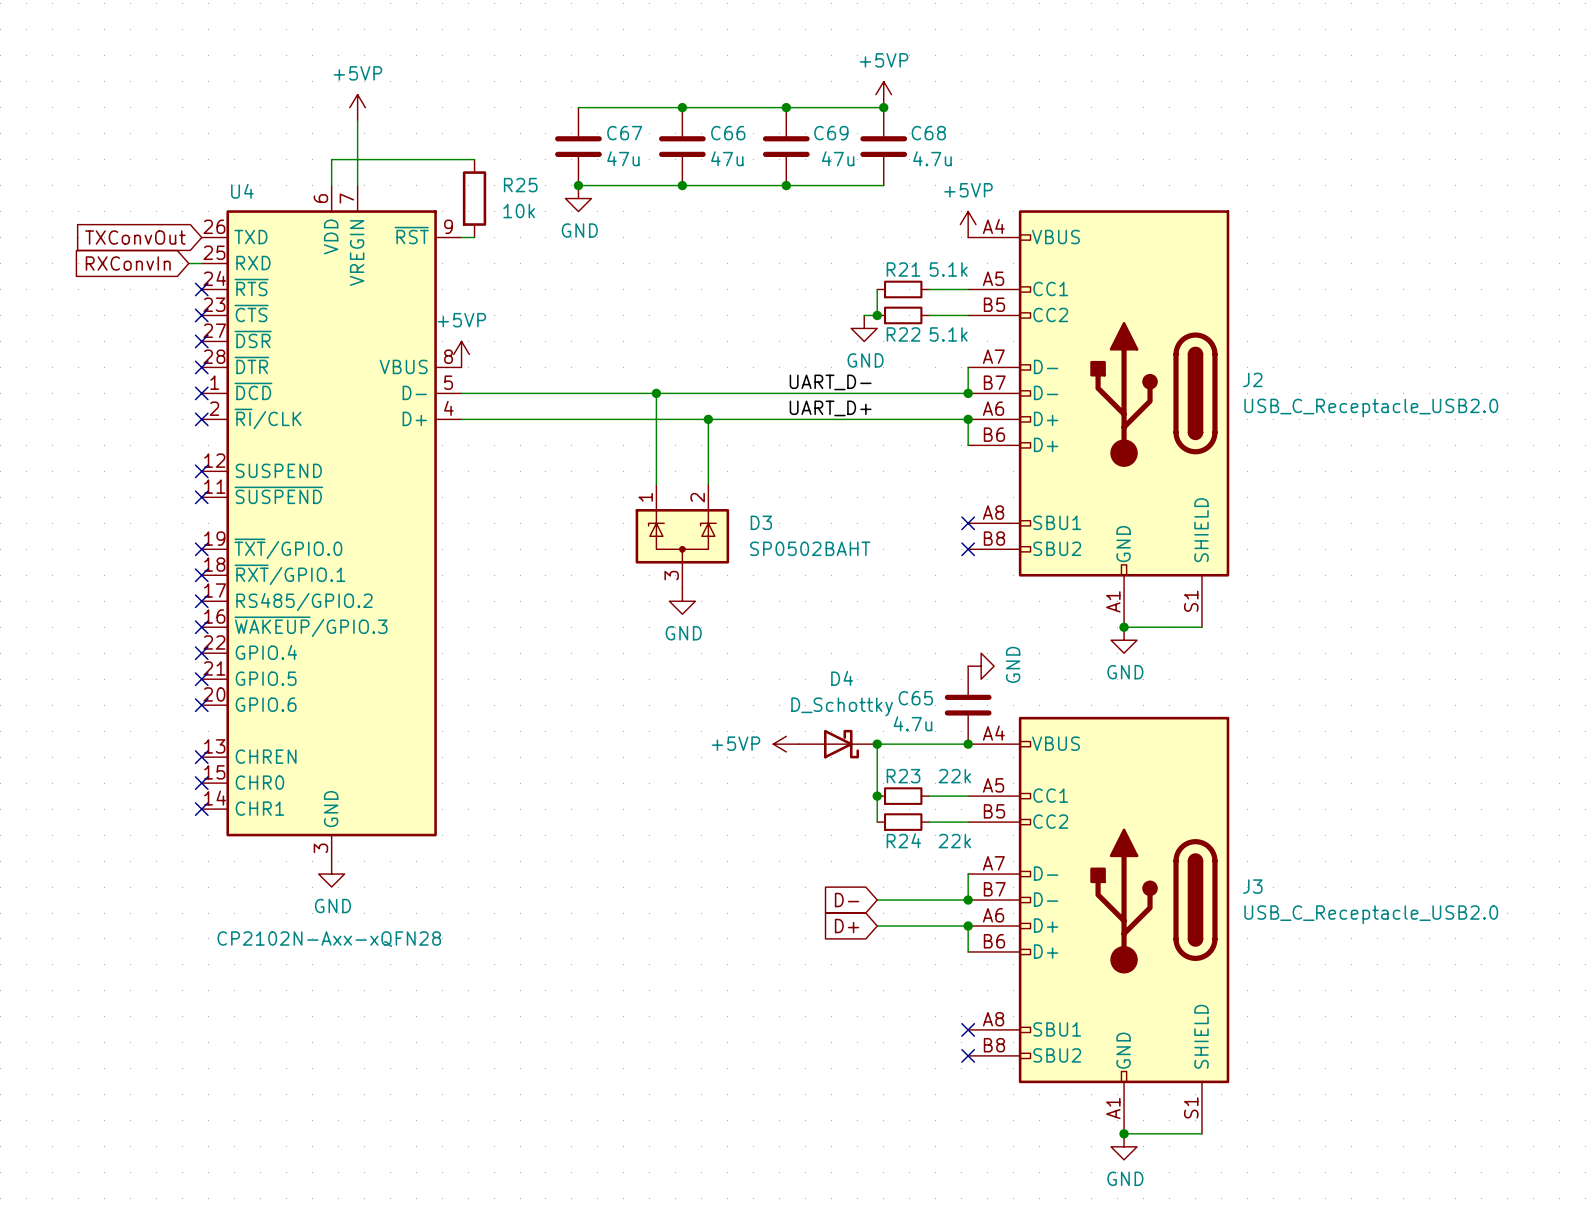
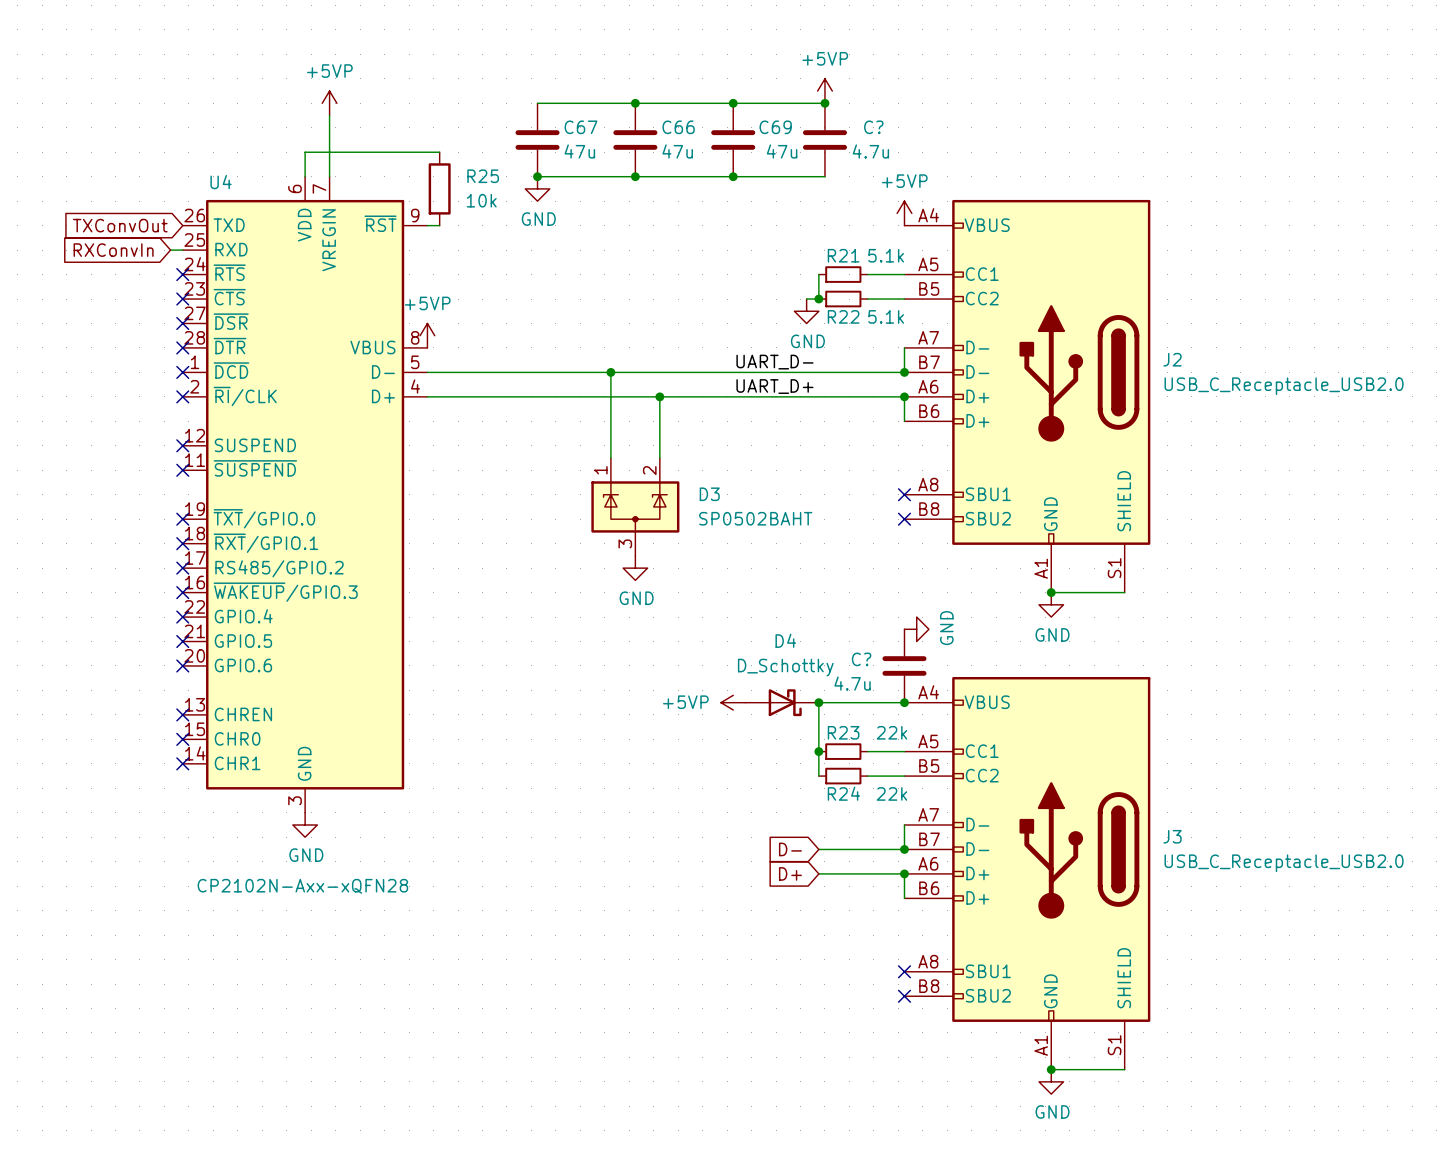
C68 name: C68 (928, 133) -> C? (873, 127)
C65 name: C65 (915, 698) -> C? (861, 659)

